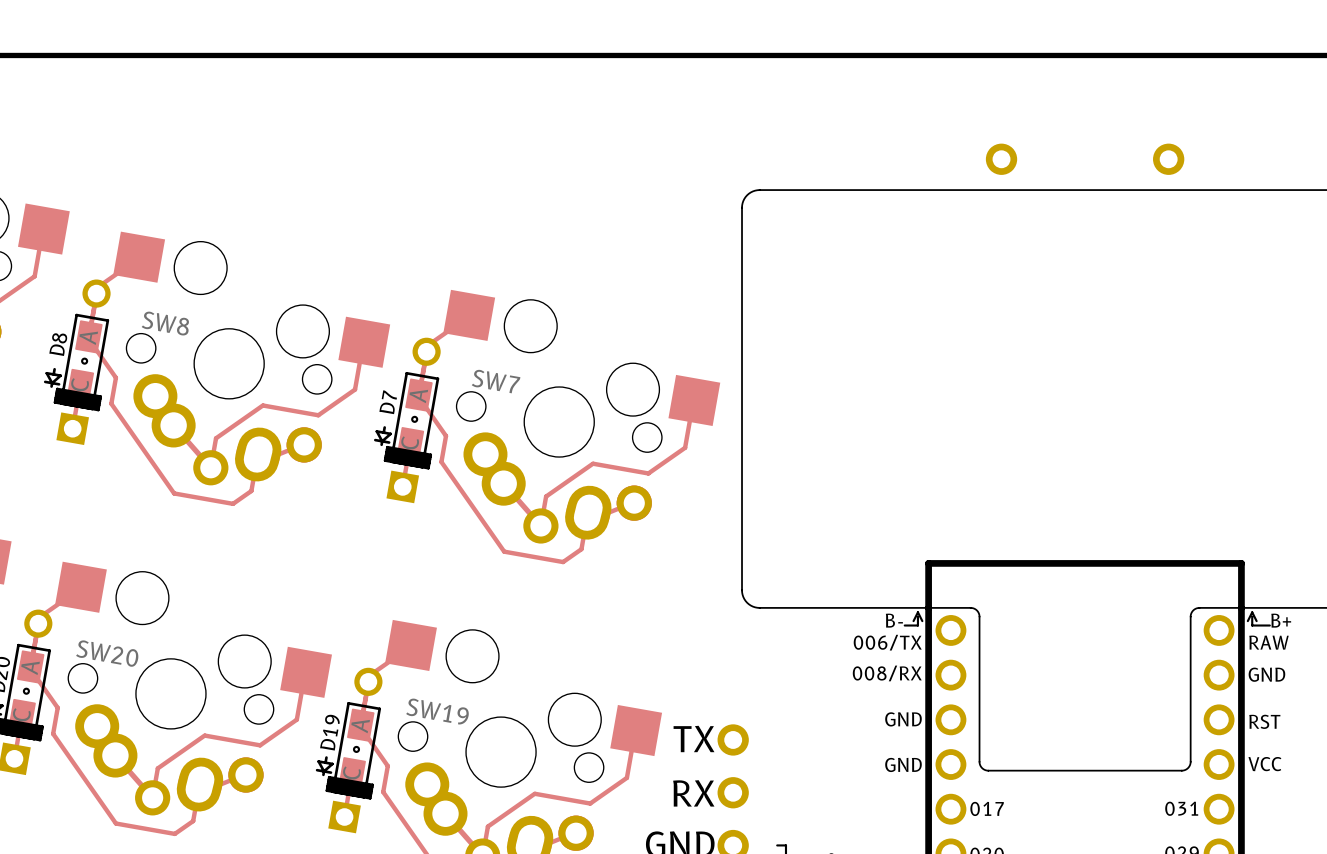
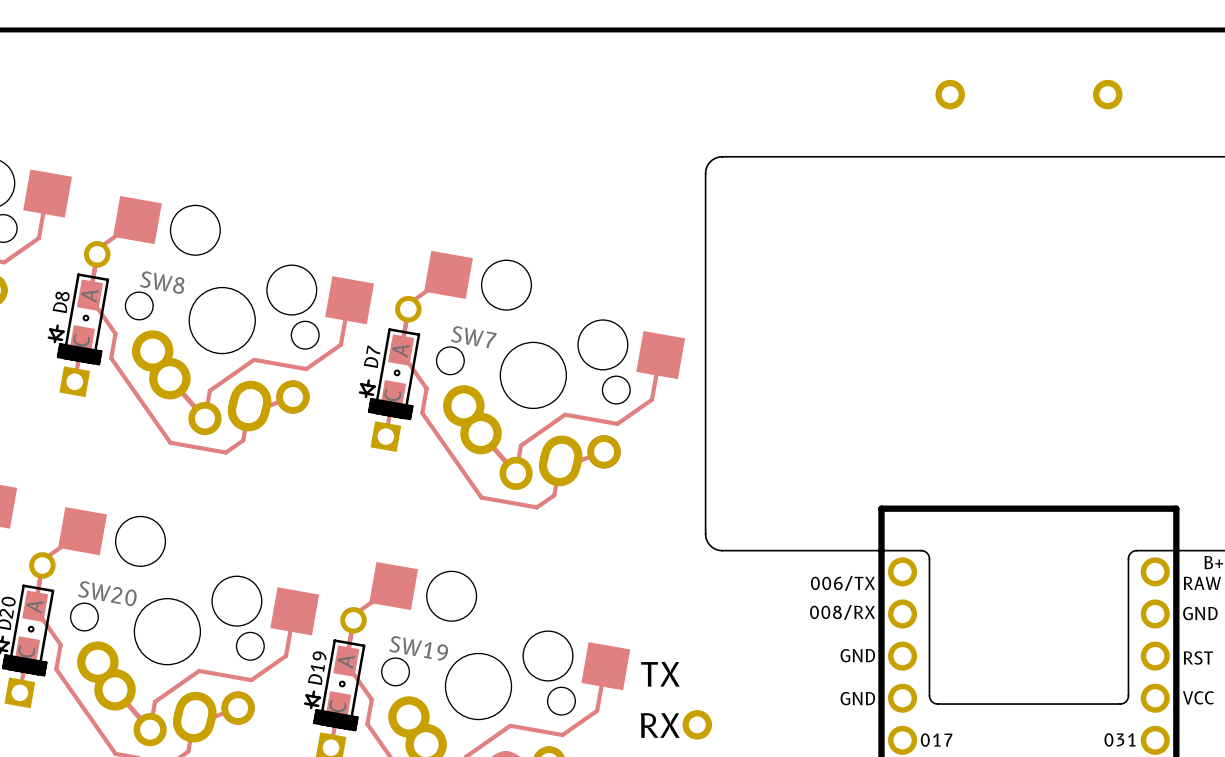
part position: (1001, 159) -> (950, 94)
part position: (1168, 159) -> (1107, 94)
line: (917, 616) (917, 625) (904, 625) -> none
line: (1252, 616) (1252, 625) (1269, 625) -> none
text: B- (894, 620) -> none
line: (913, 621) (917, 612) (922, 621) -> none
line: (1247, 621) (1252, 612) (1256, 621) -> none
part: (733, 739) -> none

